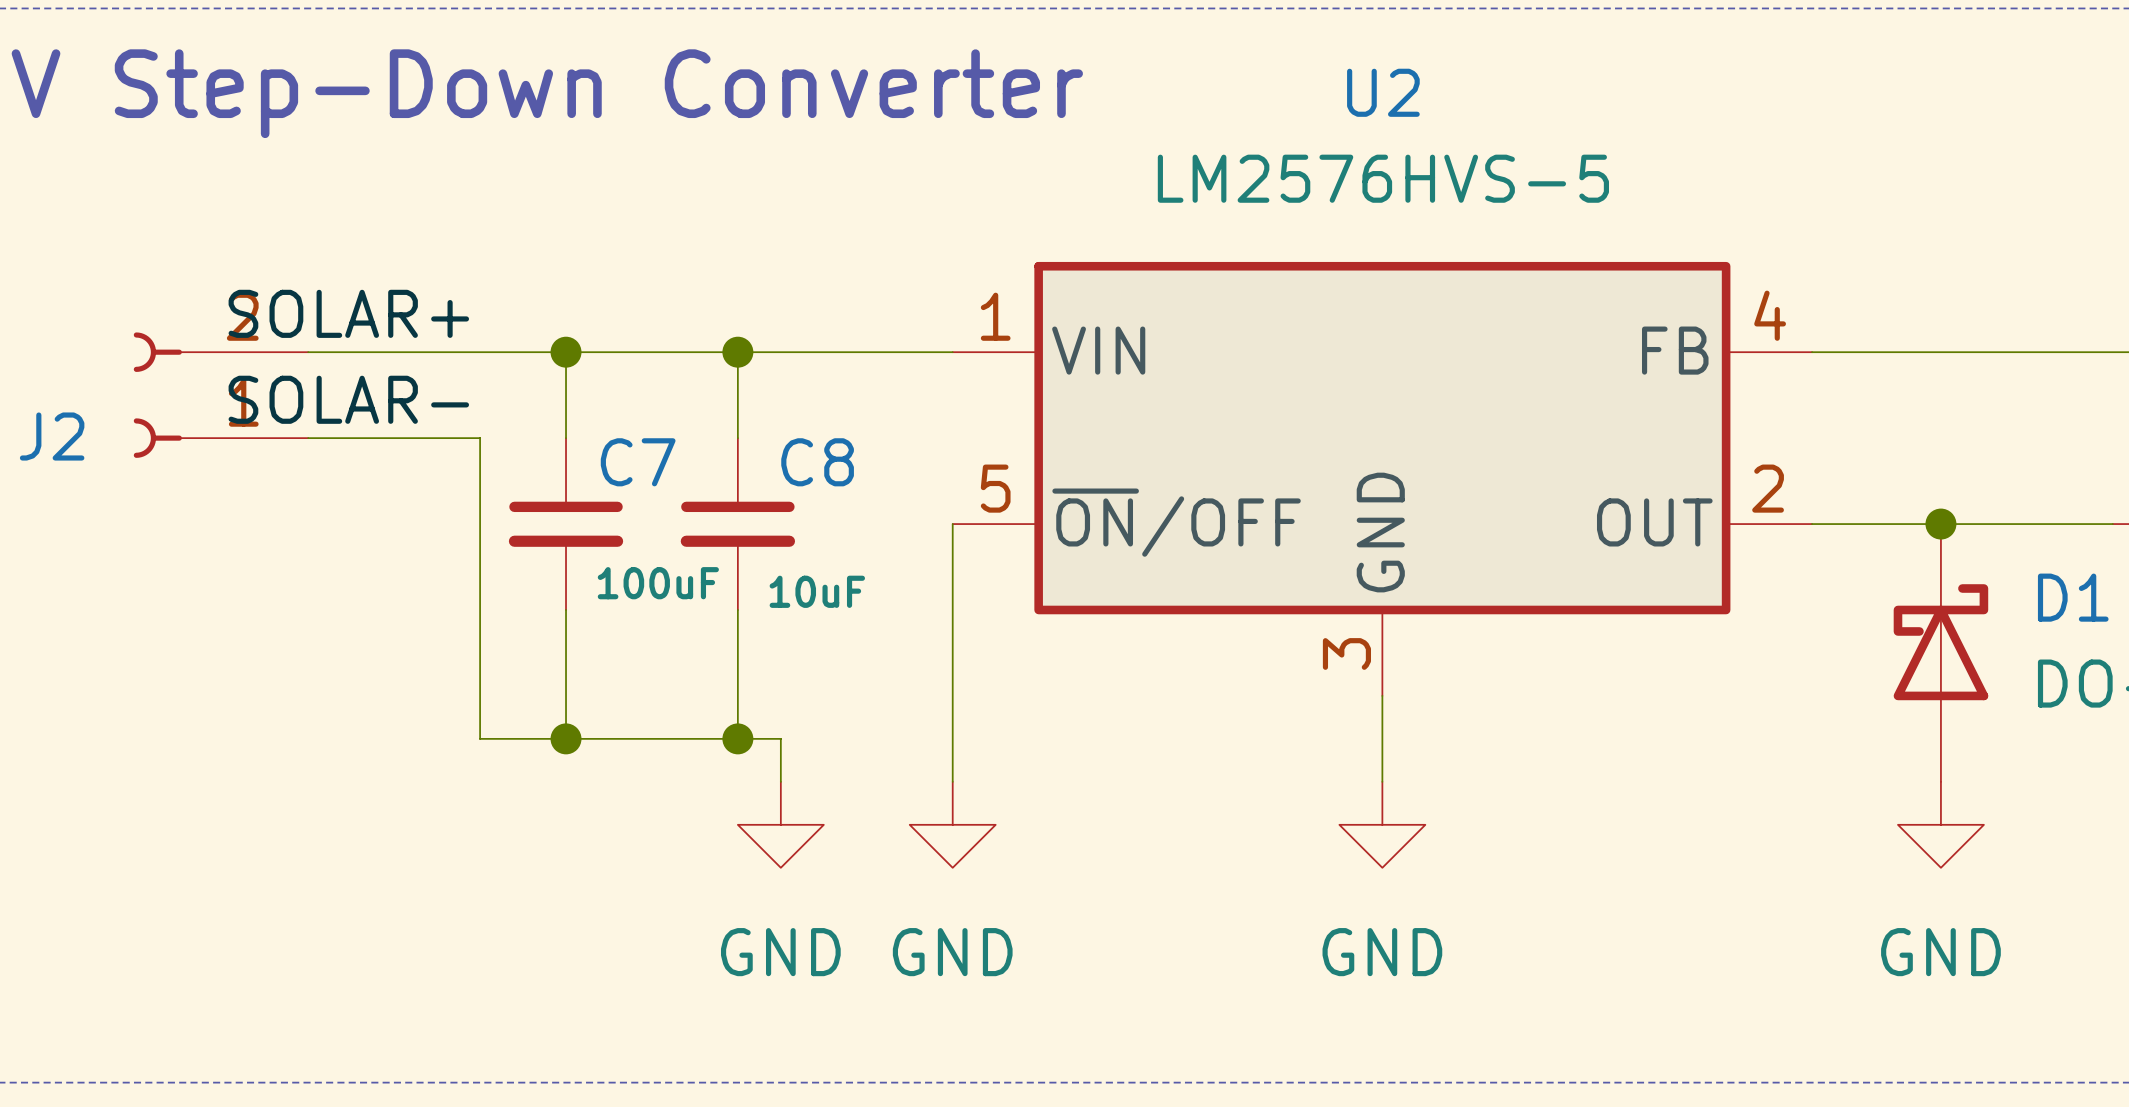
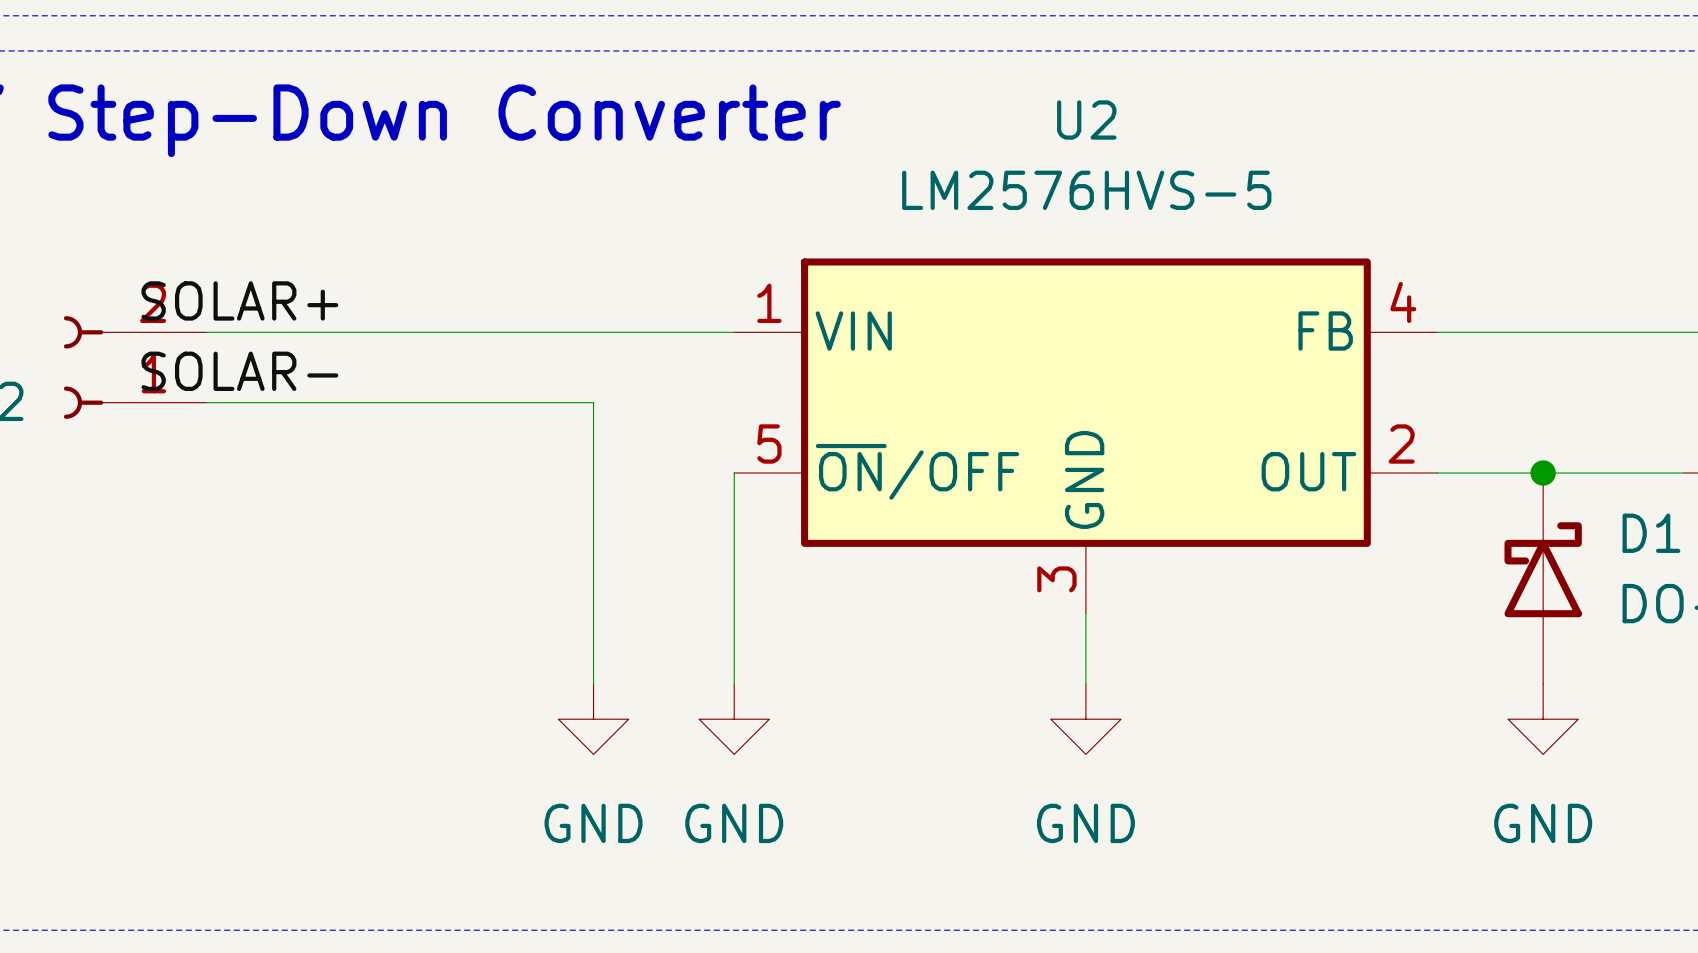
wire: (566, 352) (566, 438) -> none
junction: (566, 352) -> none
wire: (737, 352) (737, 438) -> none
junction: (737, 352) -> none
wire: (480, 438) (480, 738) (780, 738) -> (347, 402) (593, 402) (593, 648)
C7: 100uF (566, 524) -> none
C8: 10uF (737, 524) -> none
wire: (566, 609) (566, 738) -> none
wire: (737, 609) (737, 738) -> none
junction: (566, 738) -> none
junction: (737, 738) -> none

